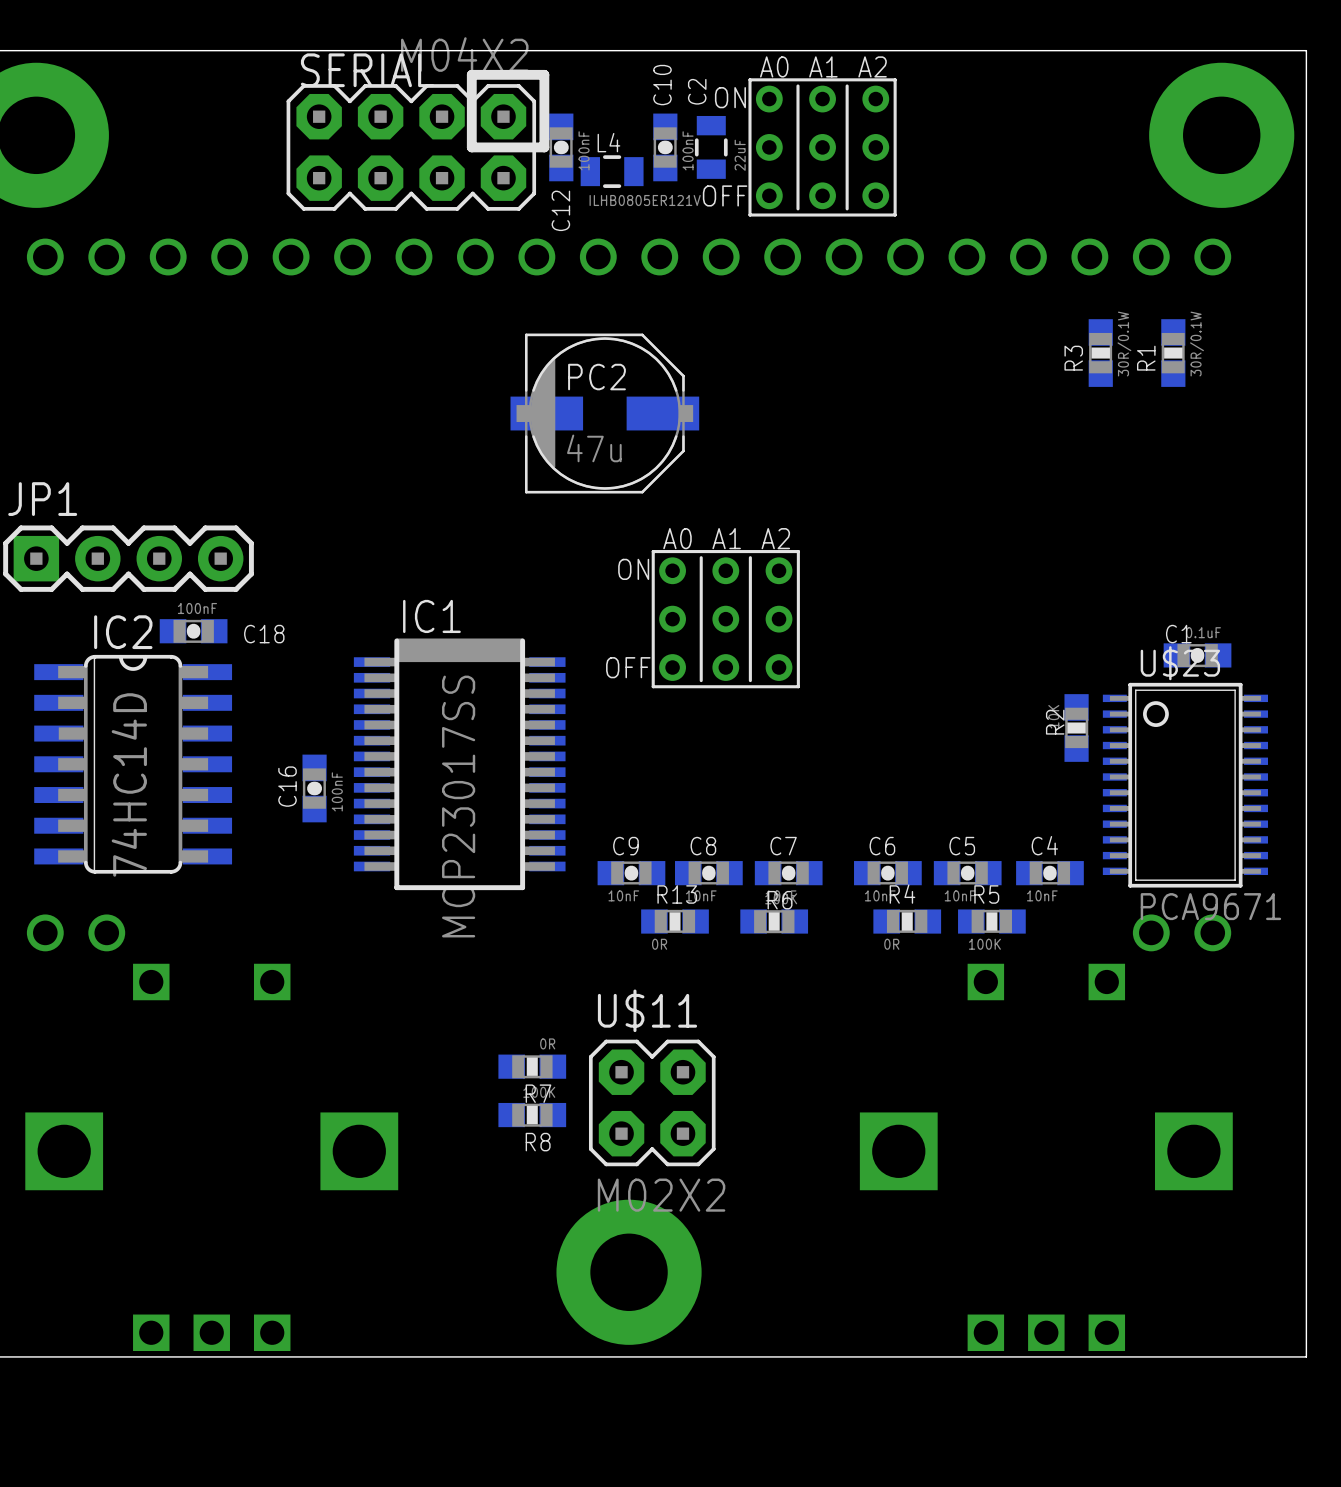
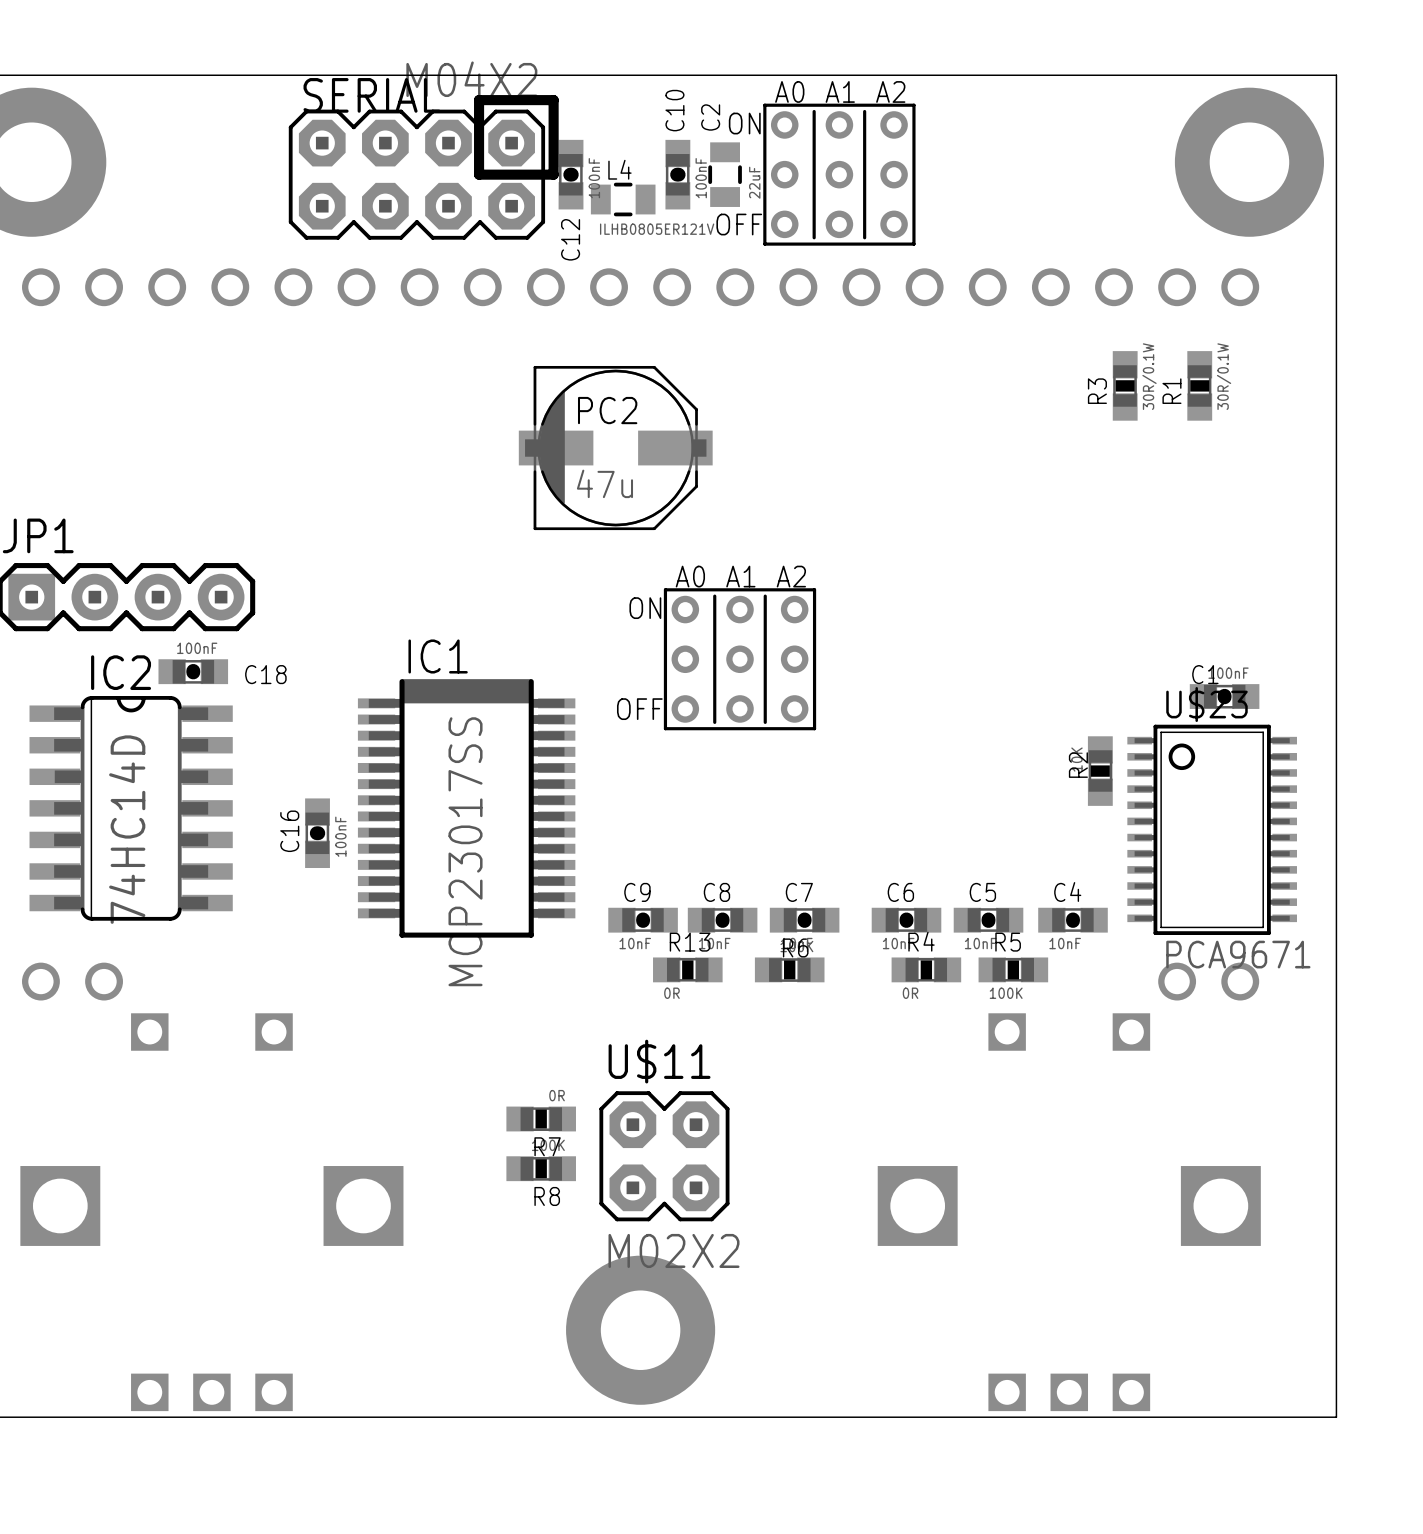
C1 value: 0.1uF (1203, 632) -> 100nF (1228, 673)

